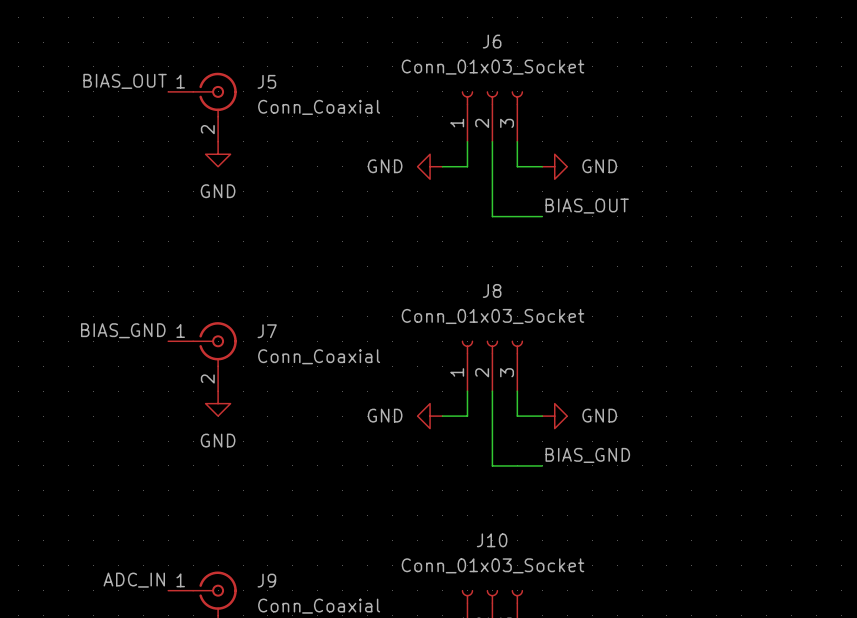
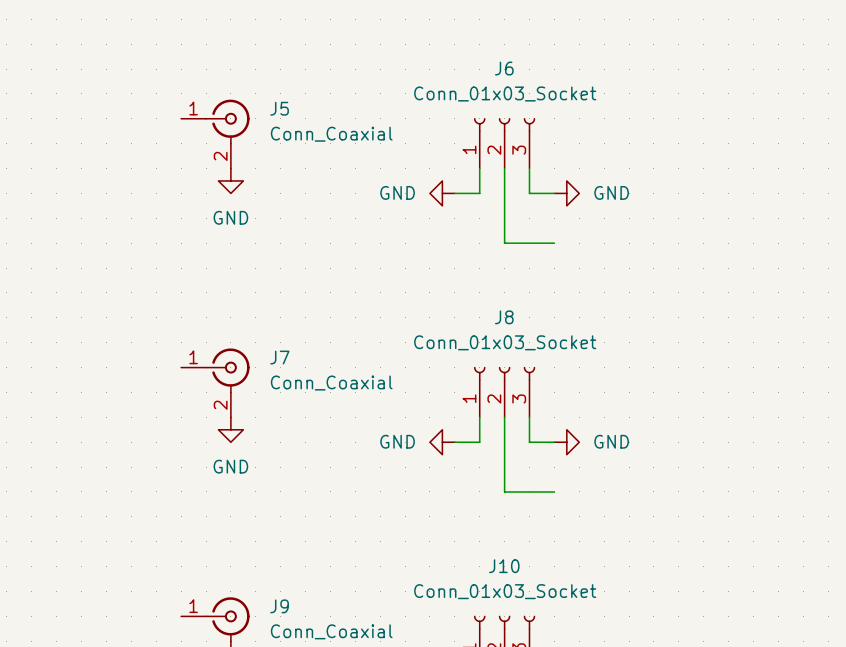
label: BIAS_OUT (125, 81) -> none
label: BIAS_OUT (587, 206) -> none
label: BIAS_GND (123, 330) -> none
label: BIAS_GND (587, 455) -> none
label: ADC_IN (134, 580) -> none

